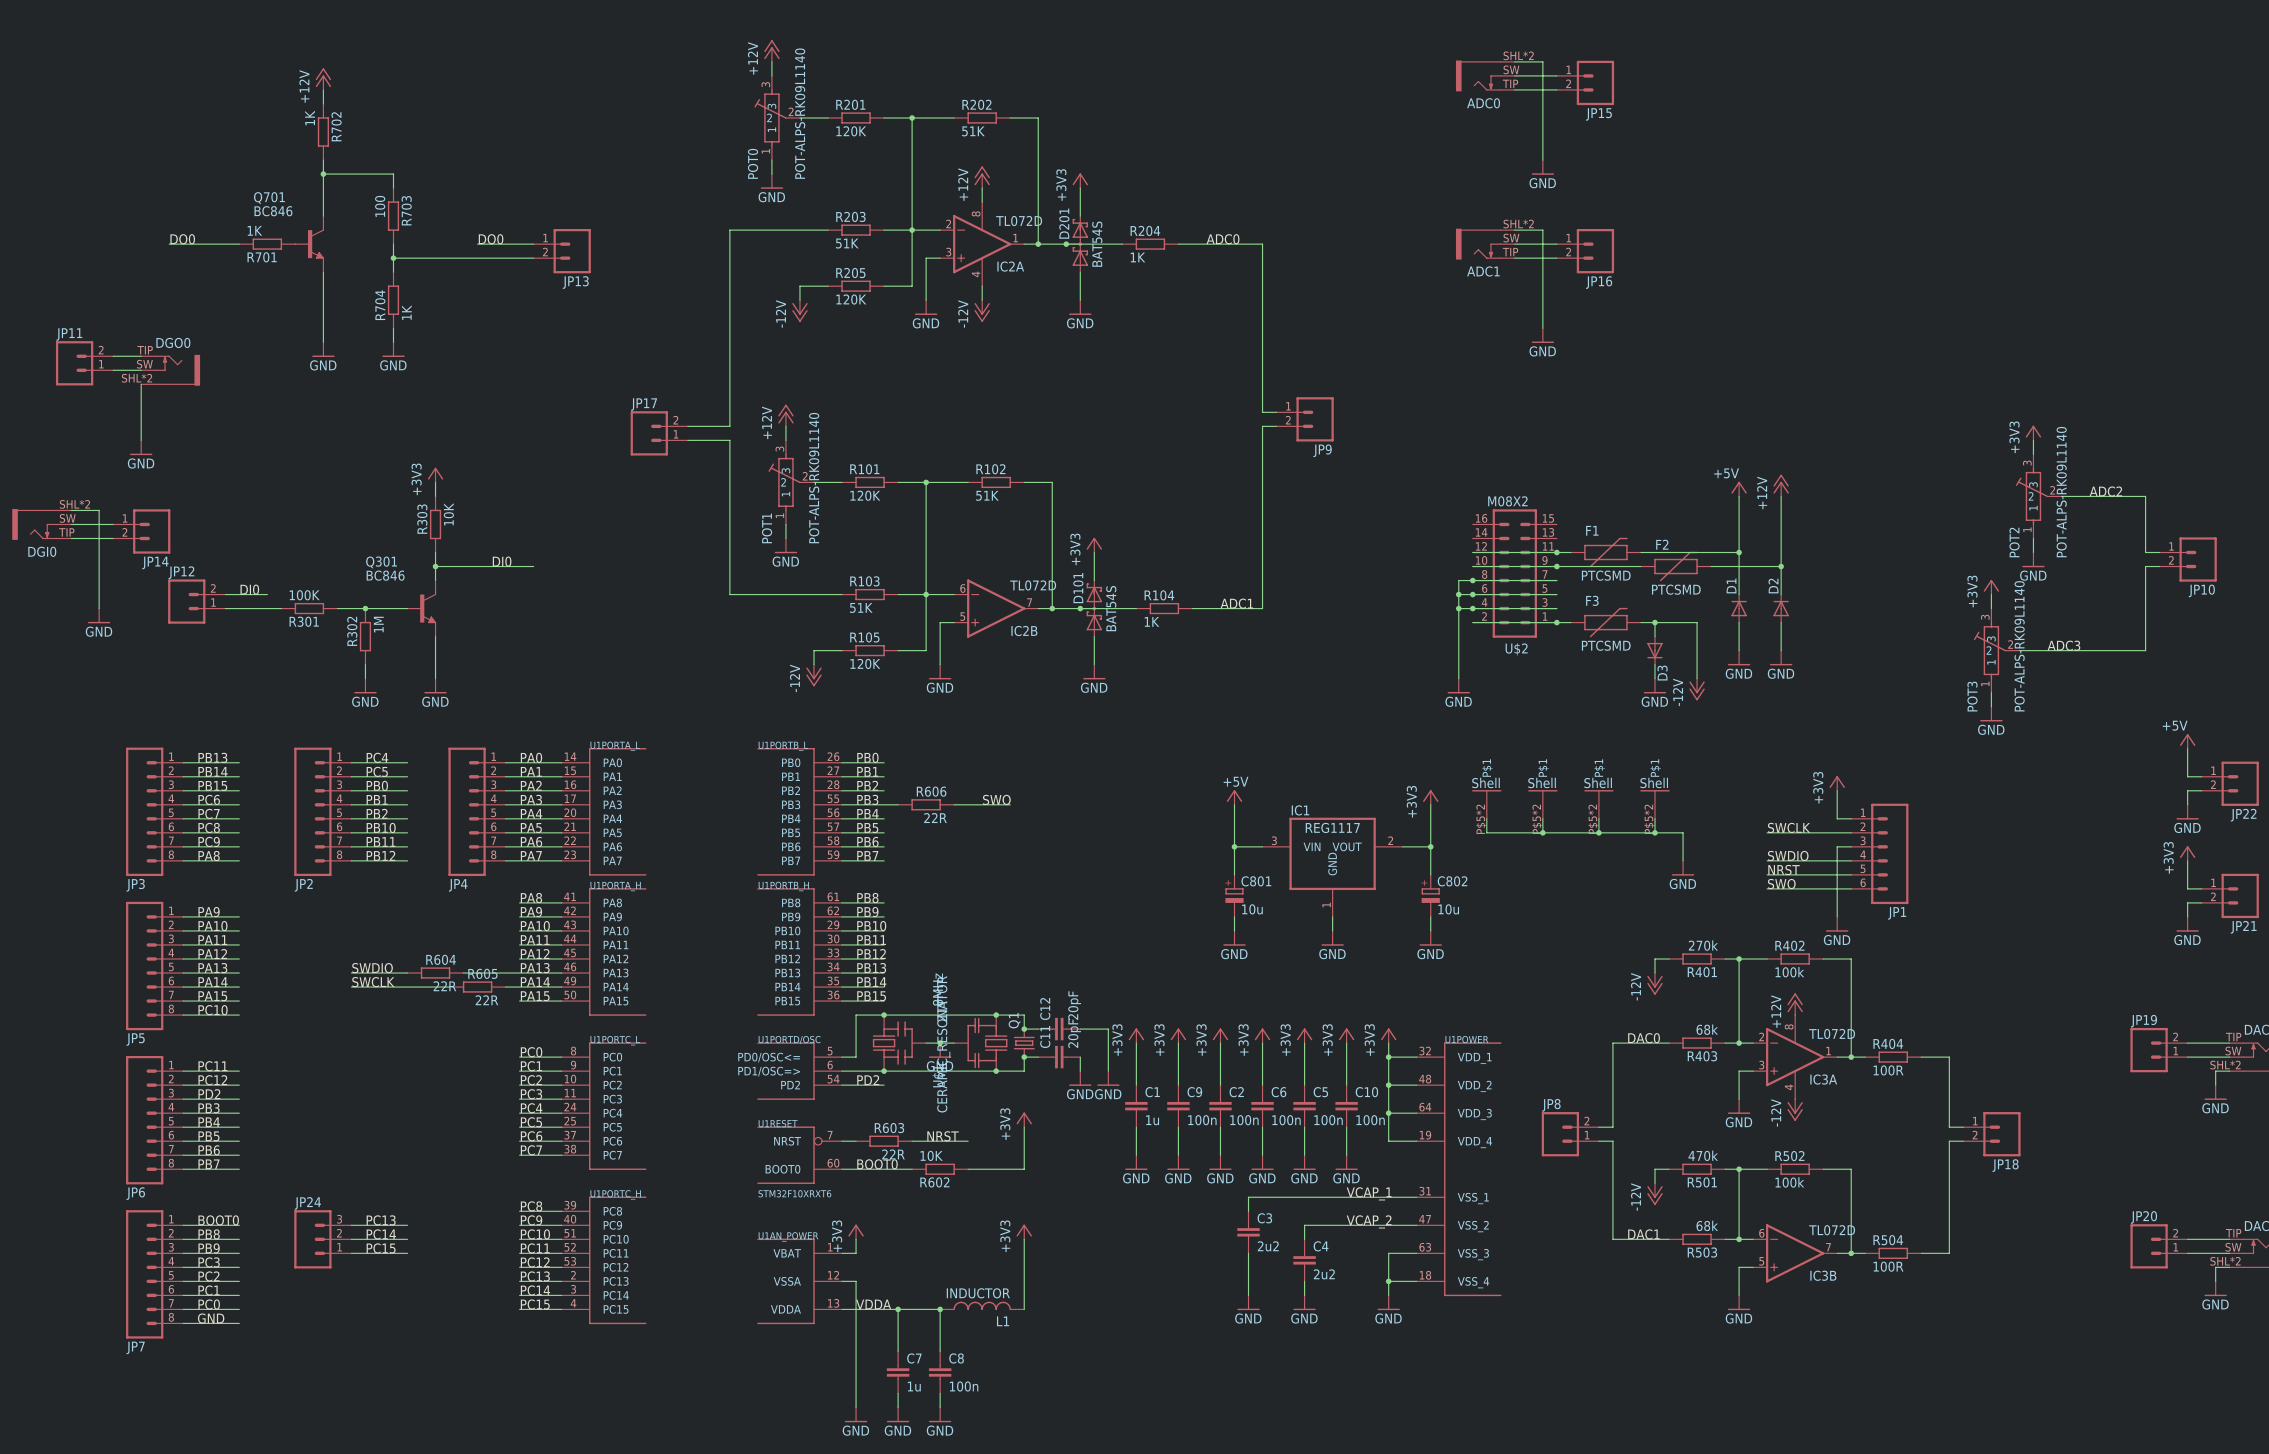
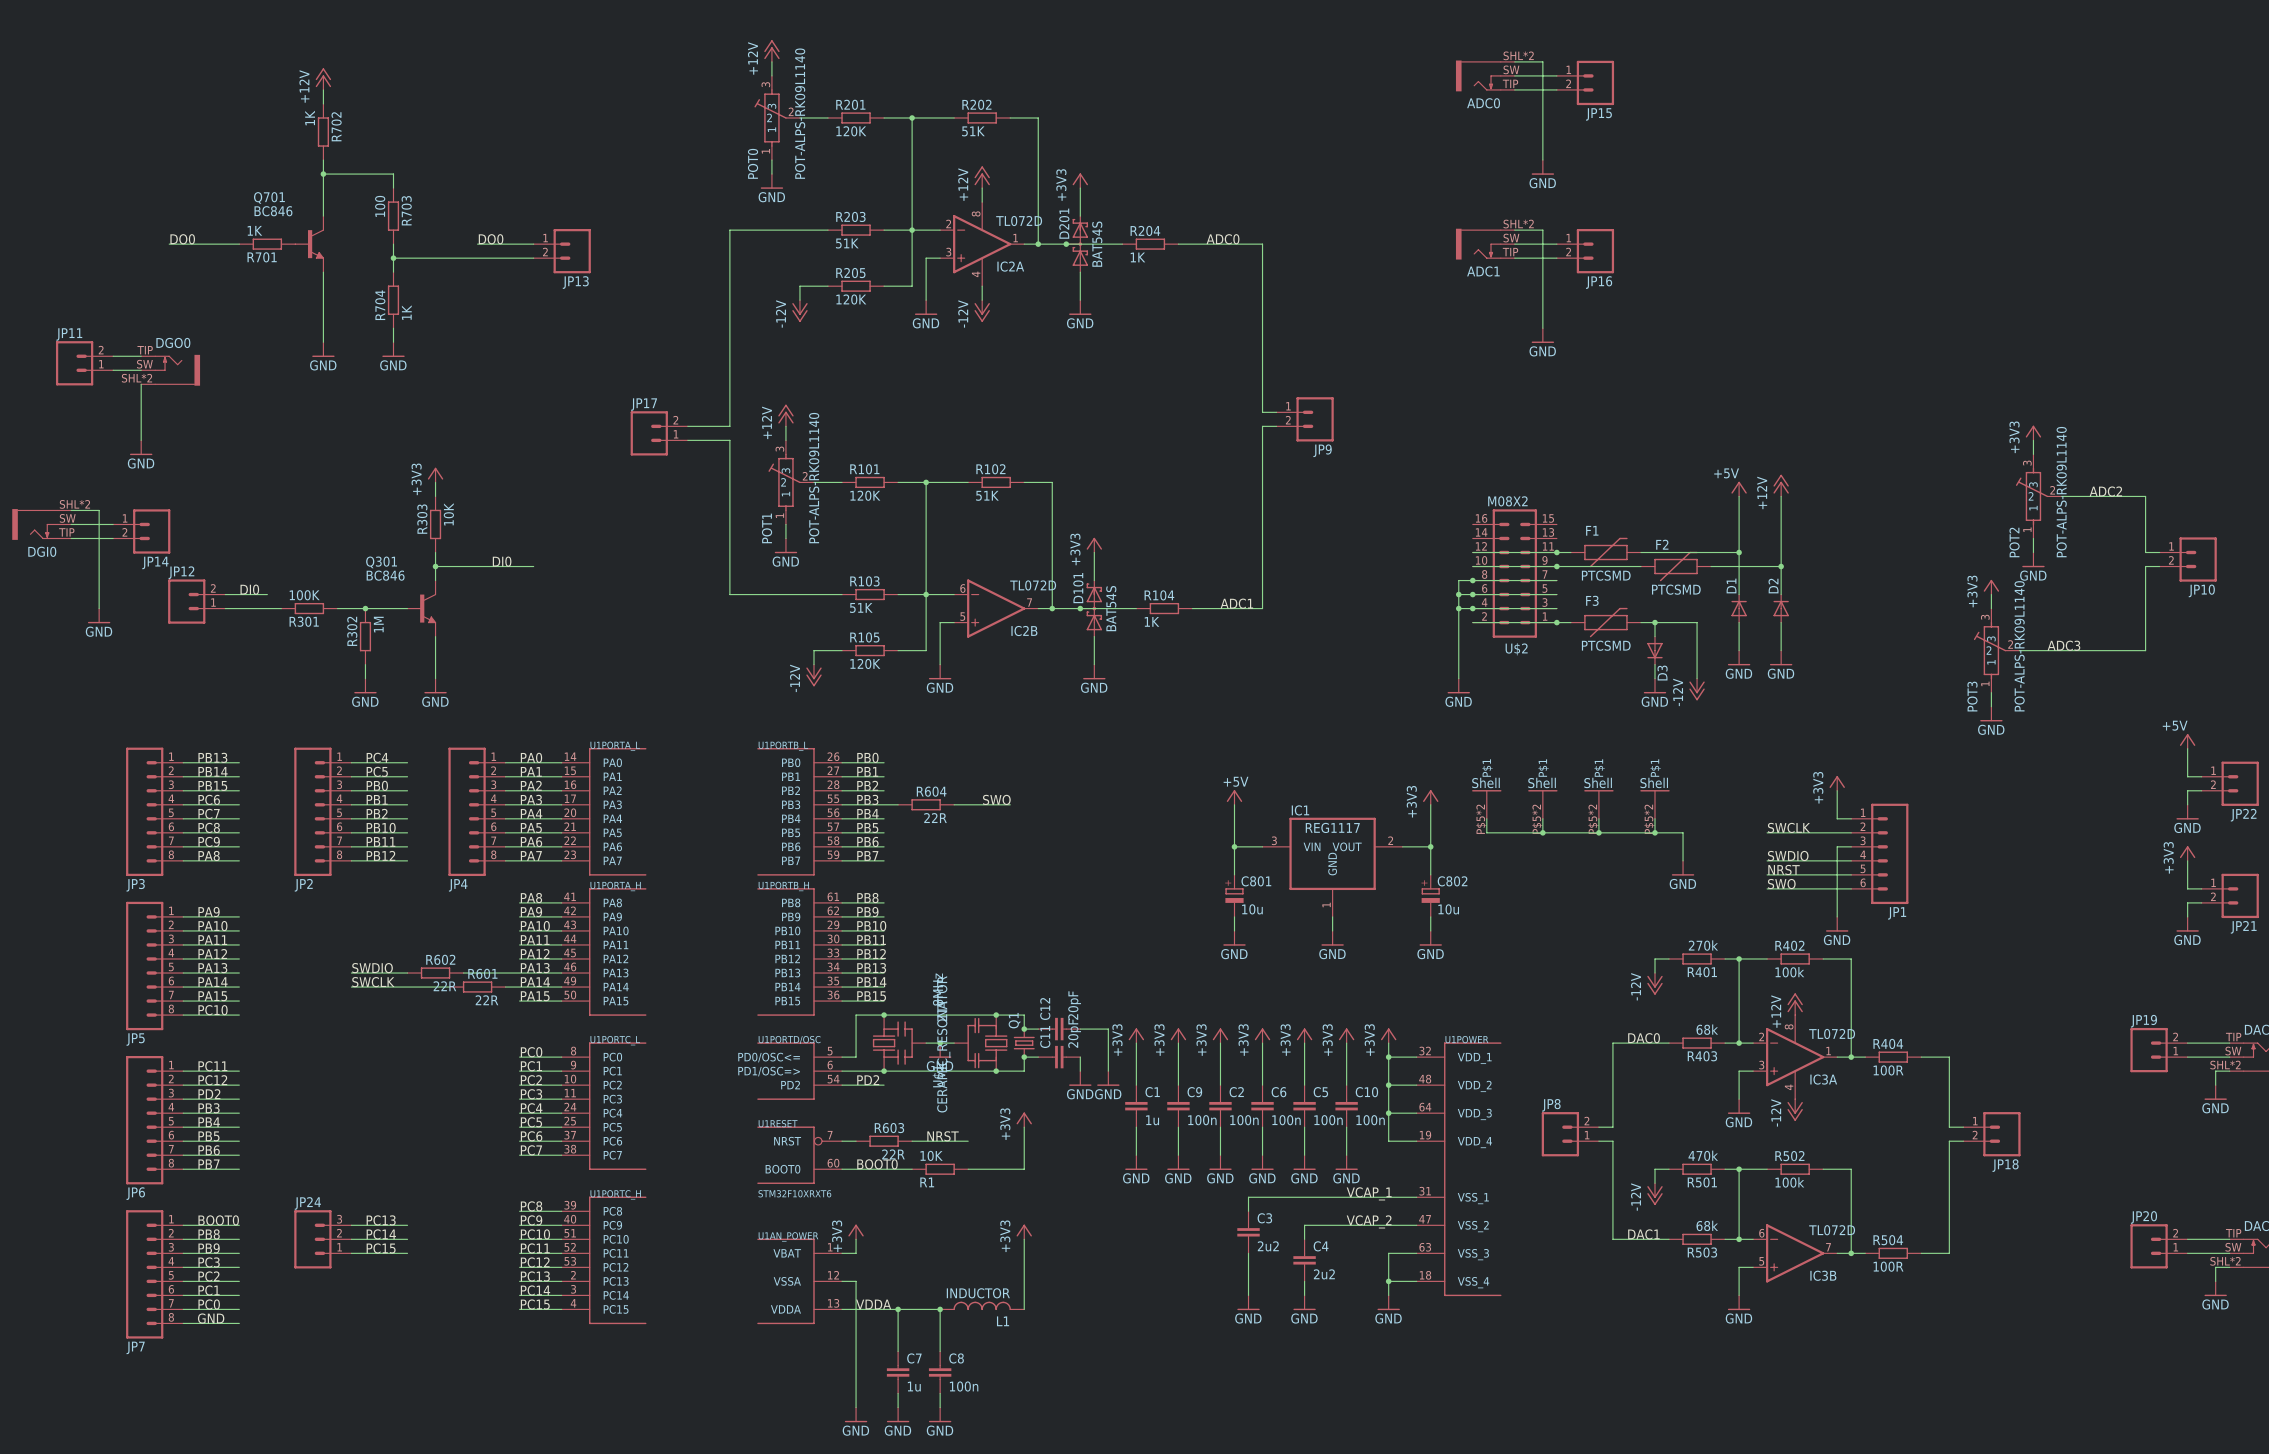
R606 name: R606 (931, 791) -> R604 (931, 791)
R604 name: R604 (441, 959) -> R602 (440, 959)
R605 name: R605 (482, 973) -> R601 (482, 973)
R602 name: R602 (934, 1182) -> R1 (927, 1182)

